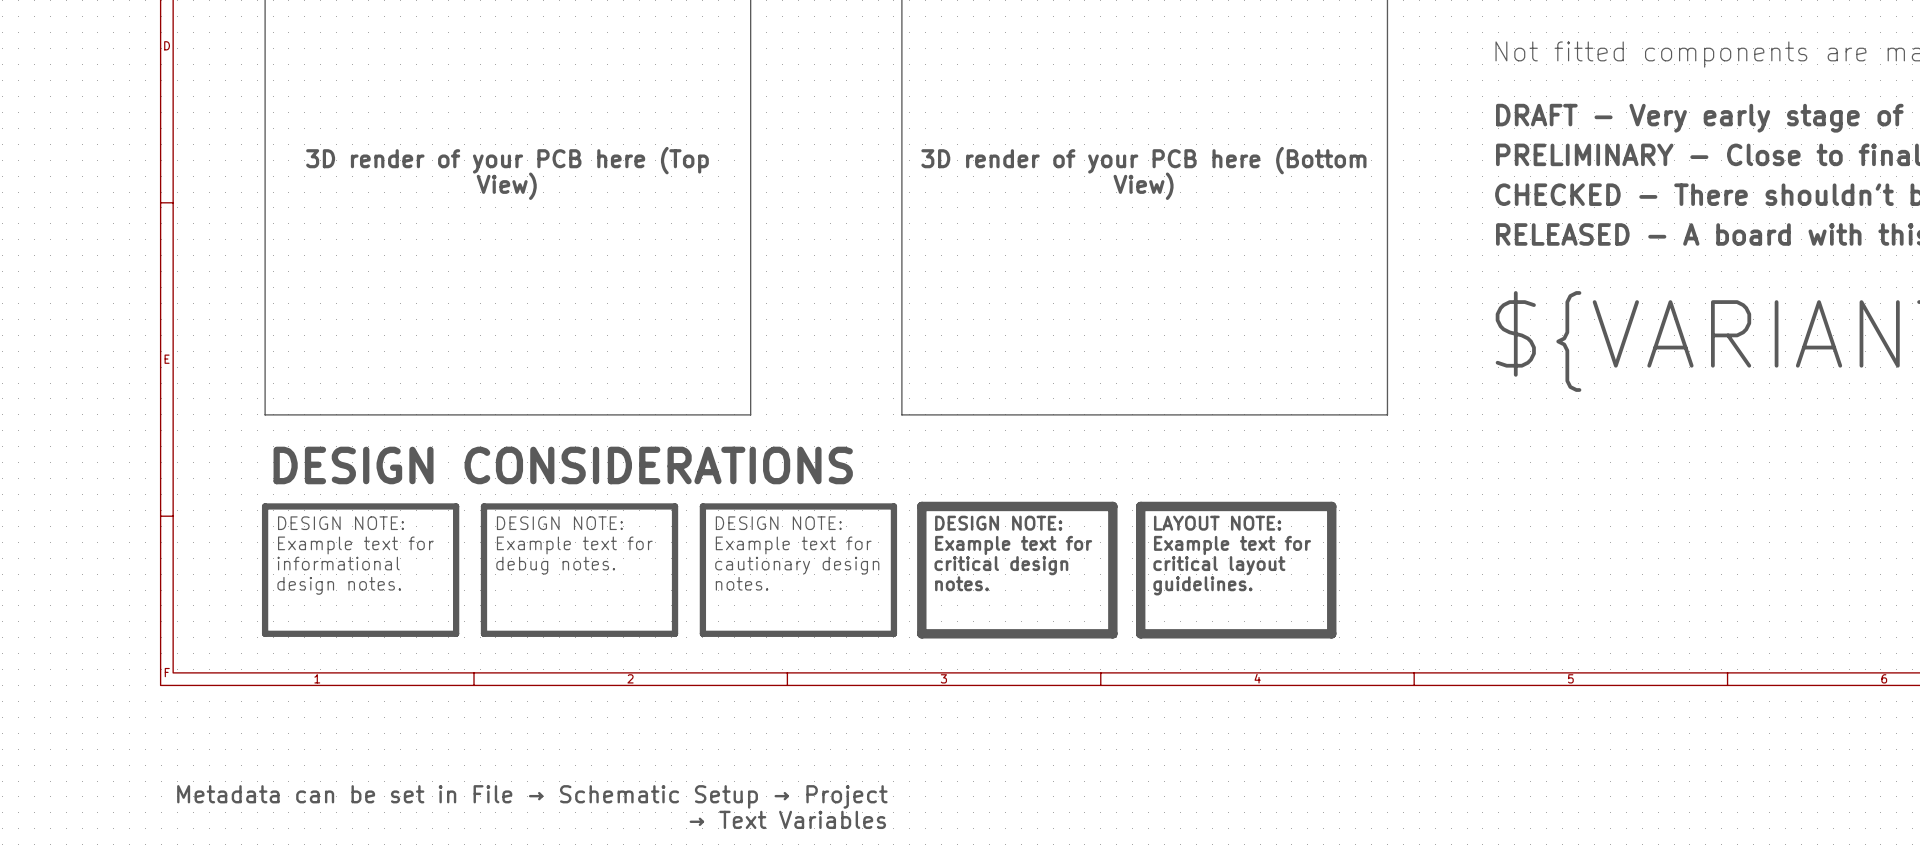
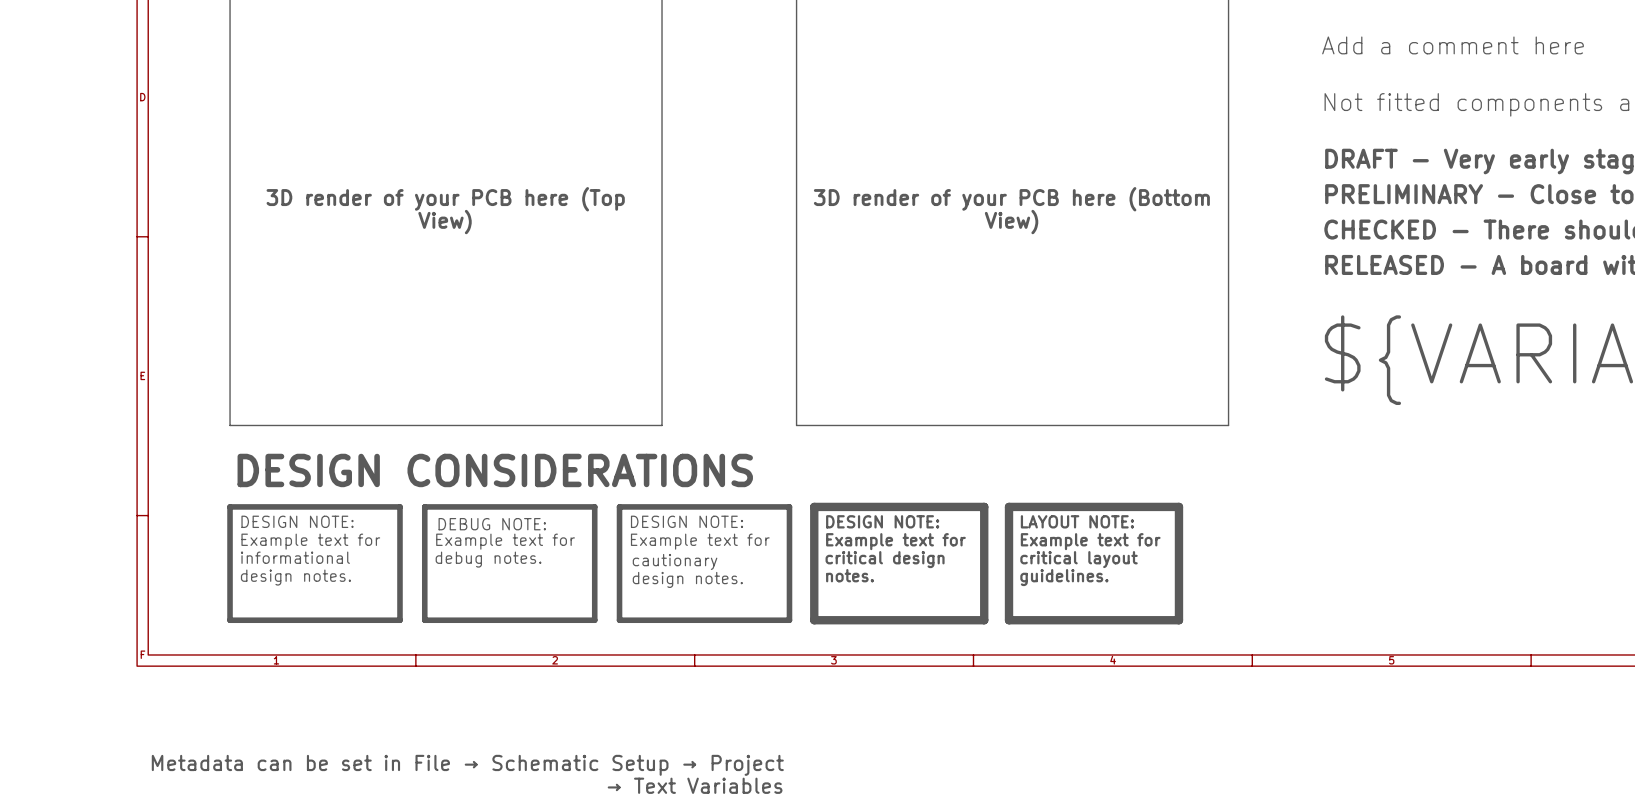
text: DESIGN NOTE: (559, 523) -> DEBUG NOTE: (492, 524)
text: cautionary design (797, 565) -> cautionary (675, 561)
text: notes. (742, 583) -> design notes. (687, 579)

